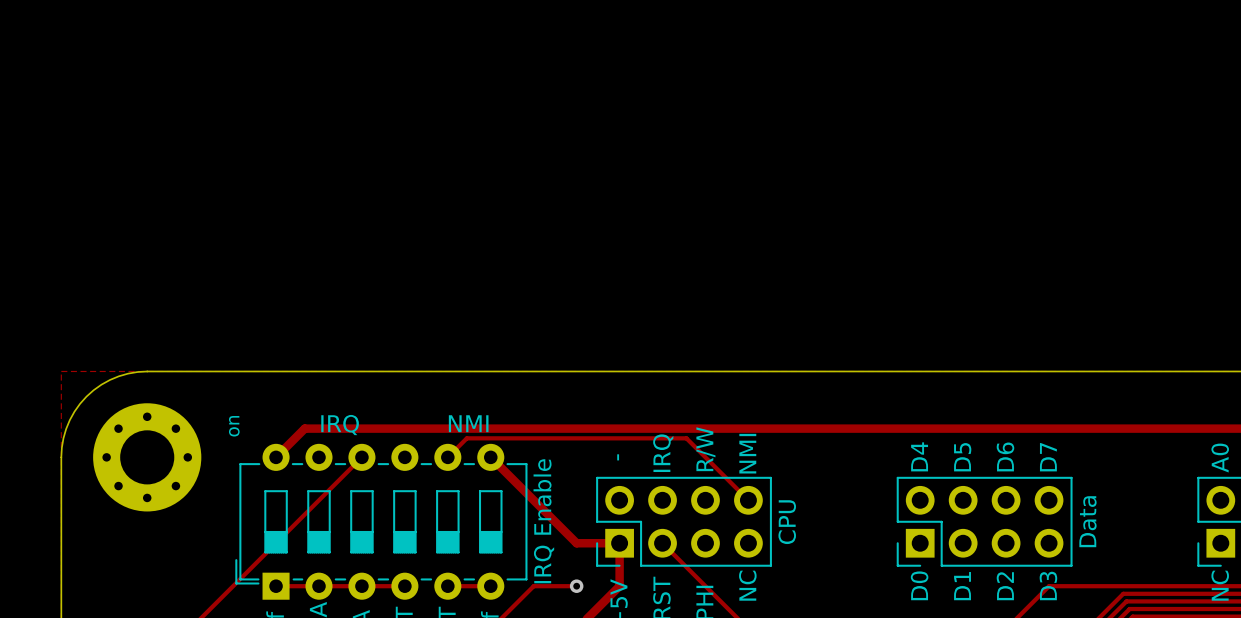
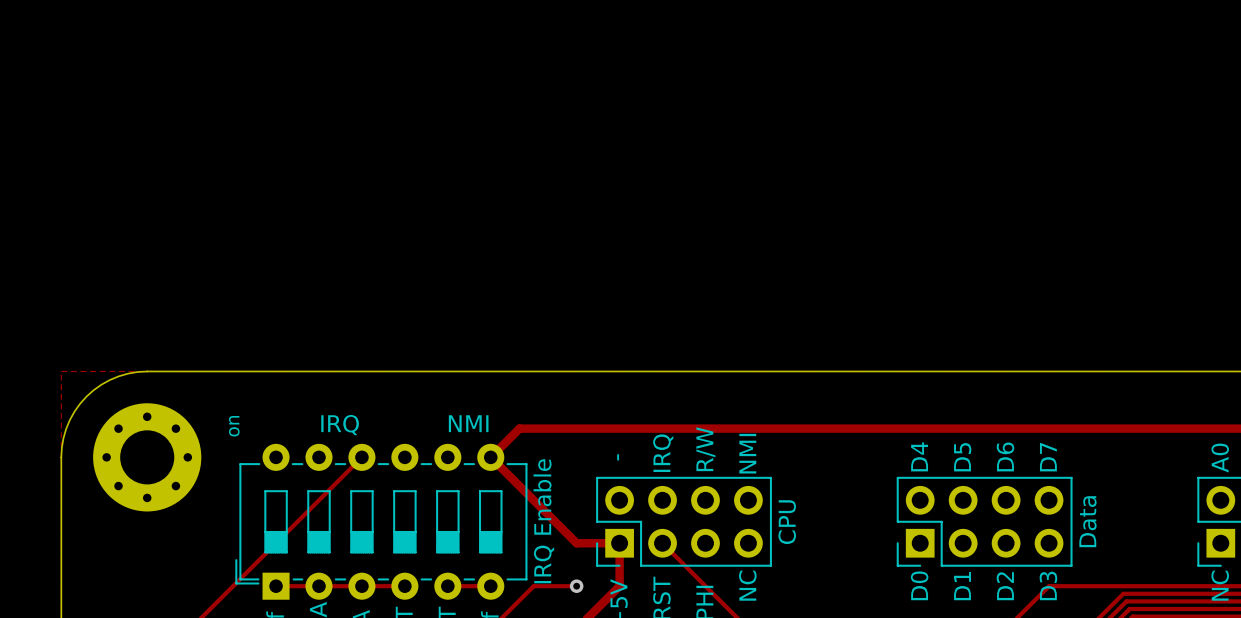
track: (519, 428) (304, 428) (276, 457) -> (519, 428) (490, 457)
track: (447, 457) (466, 438) (686, 438) (748, 500) -> none

